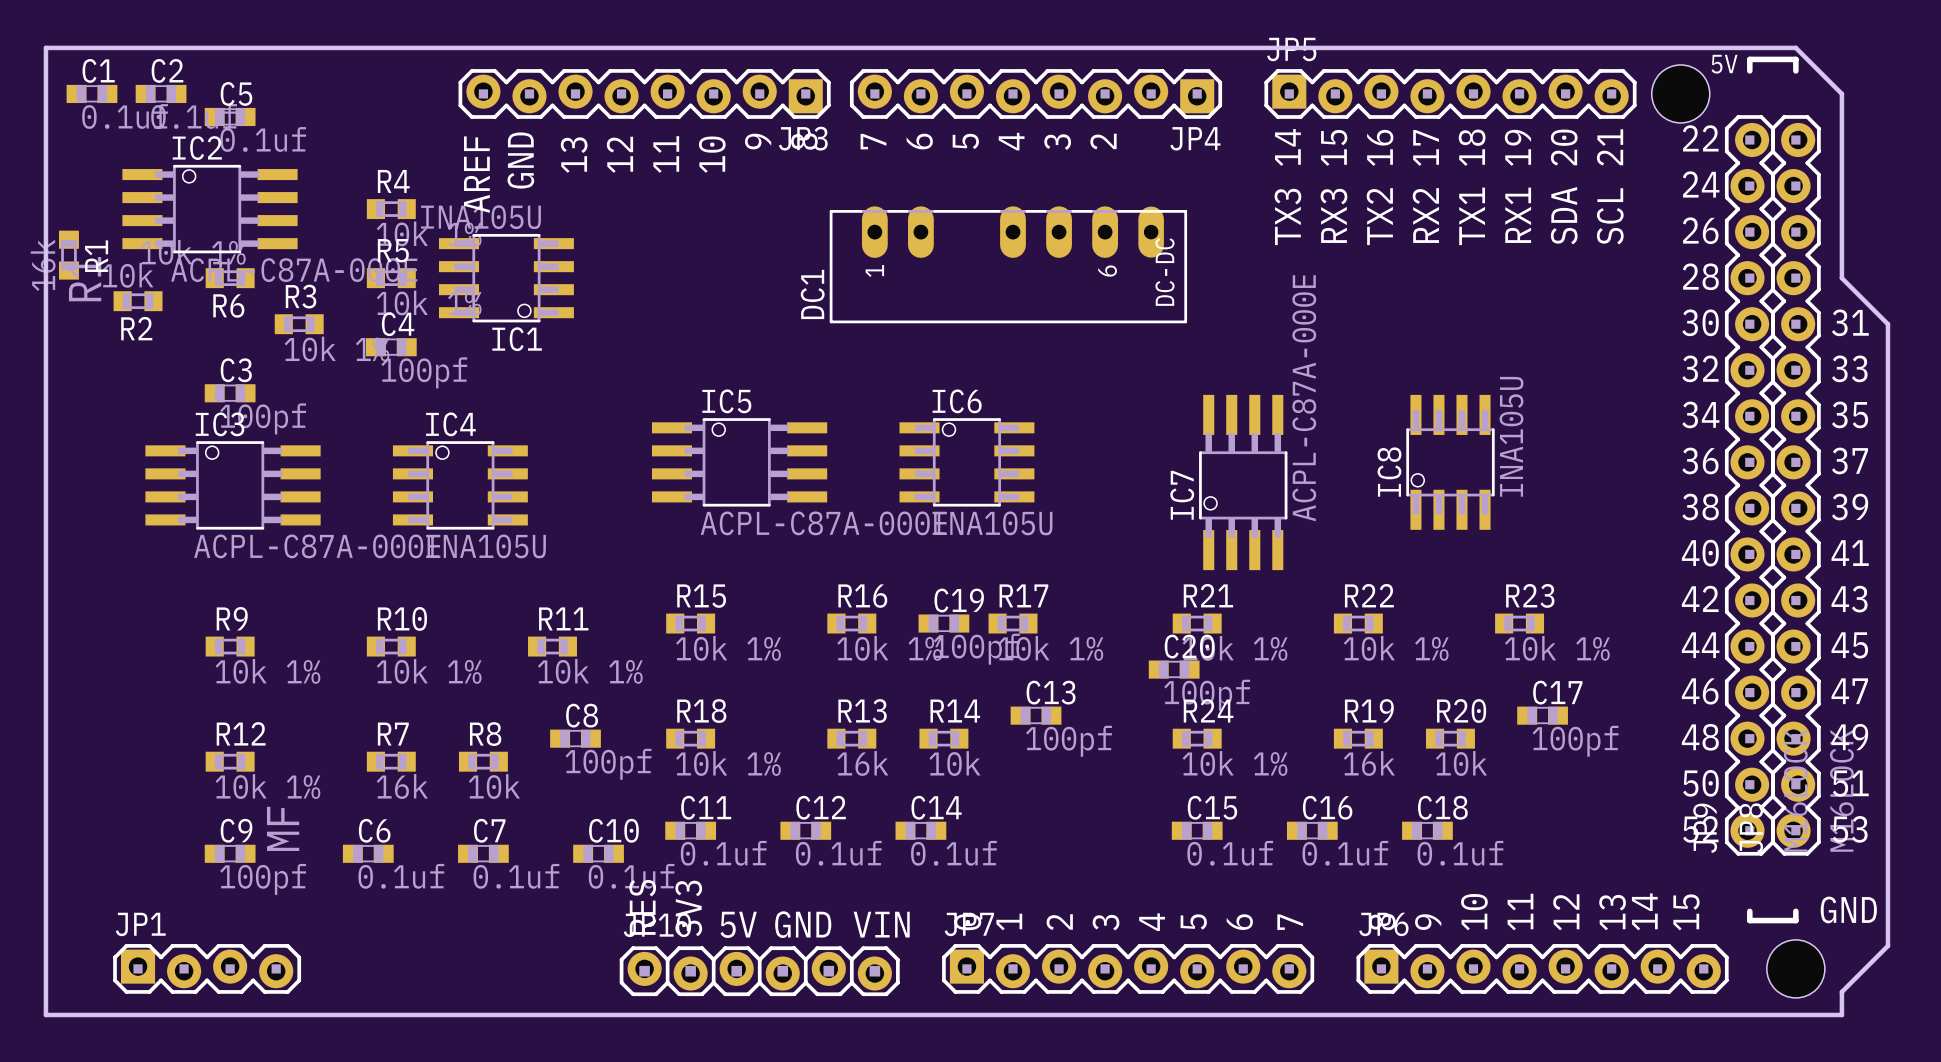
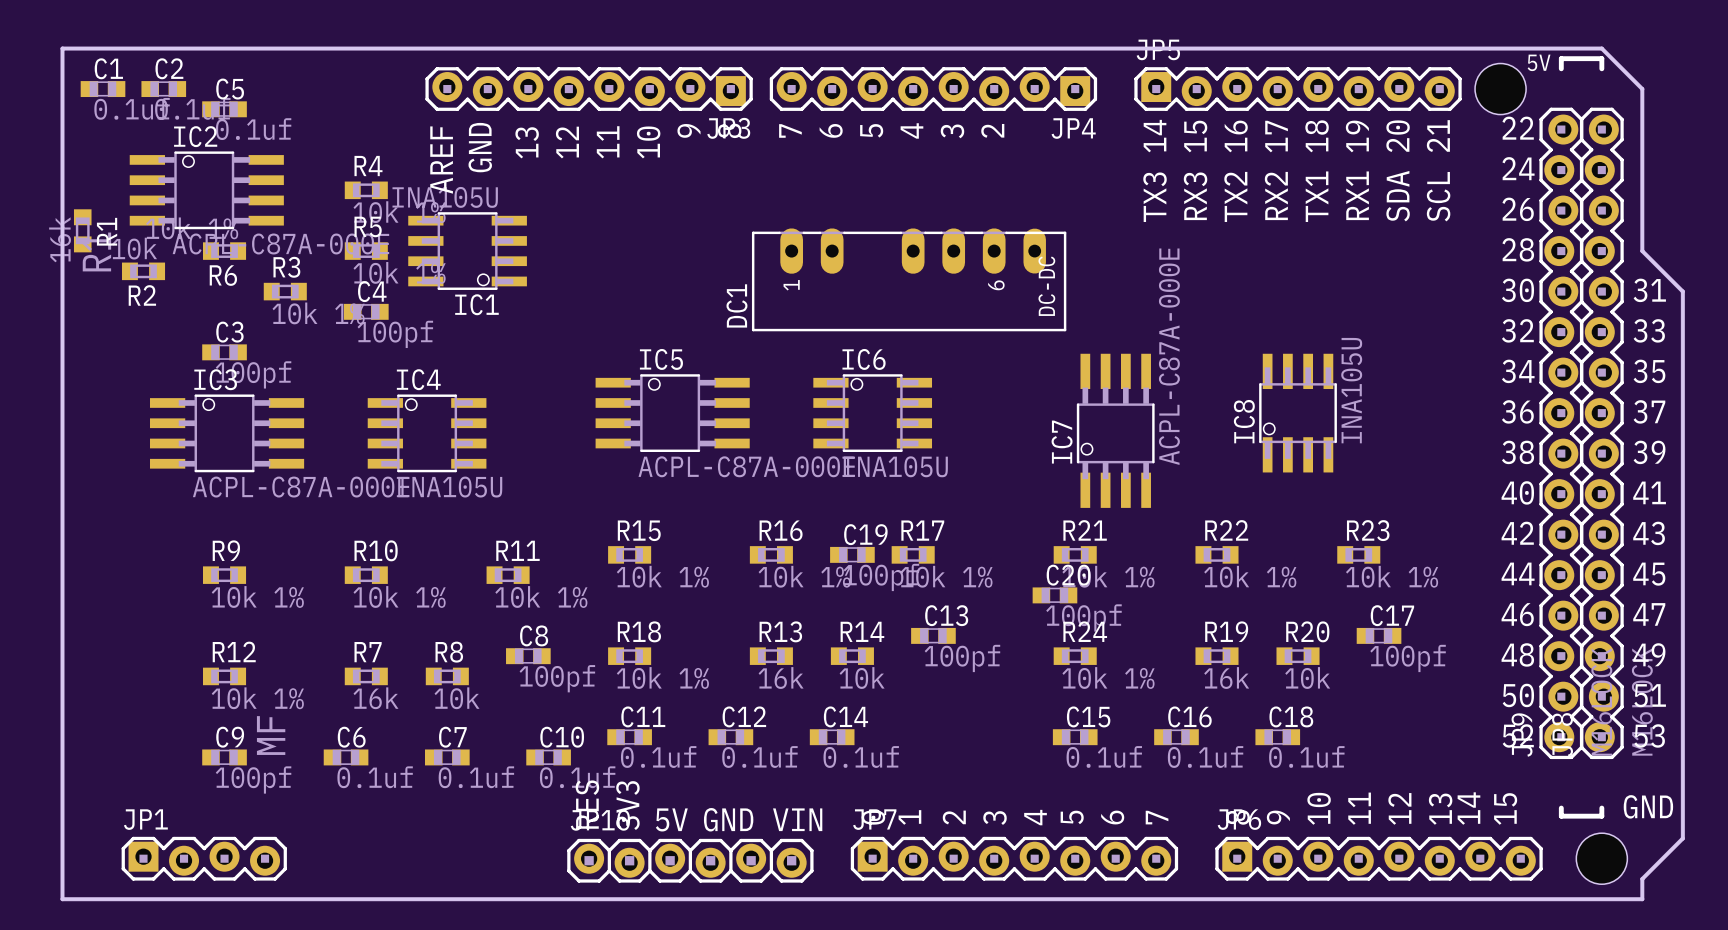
DC1 position: (1008, 264) -> (909, 279)

